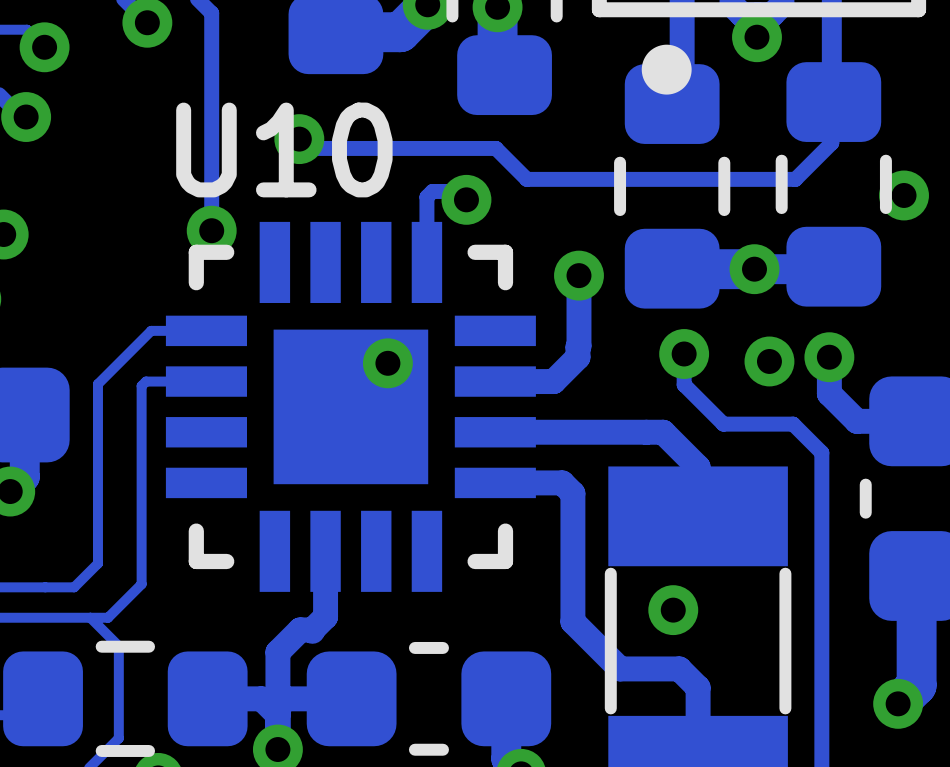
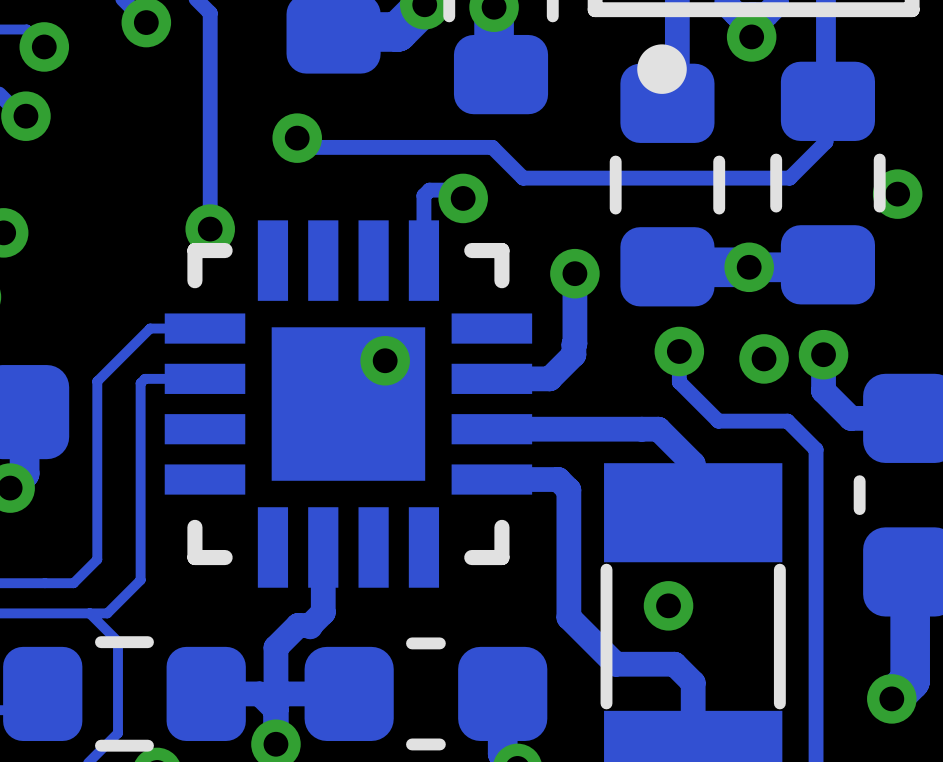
U10 name: U10 (284, 149) -> none

